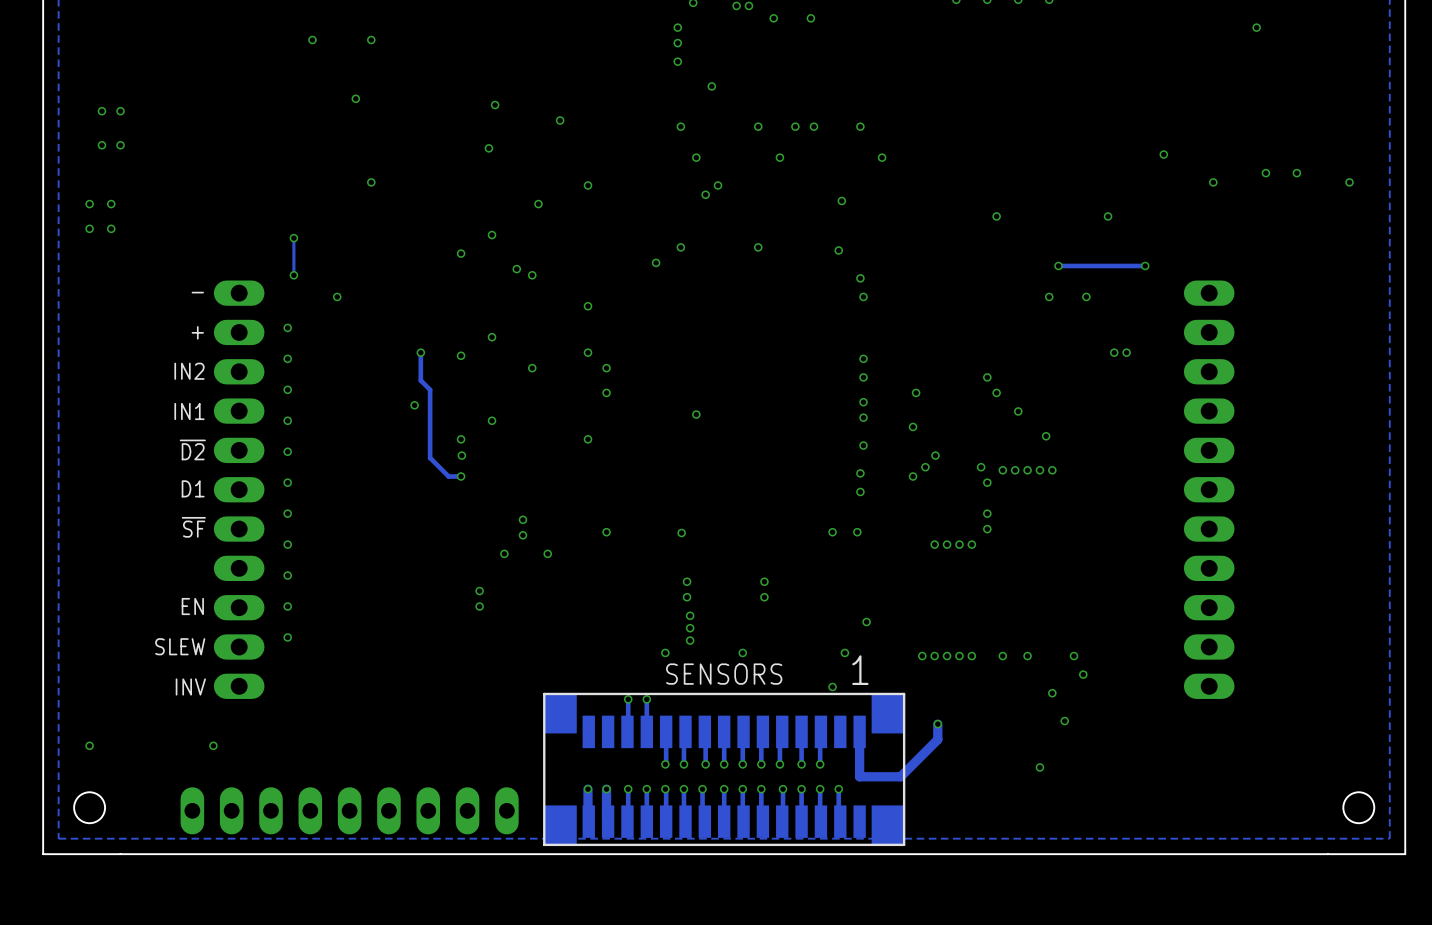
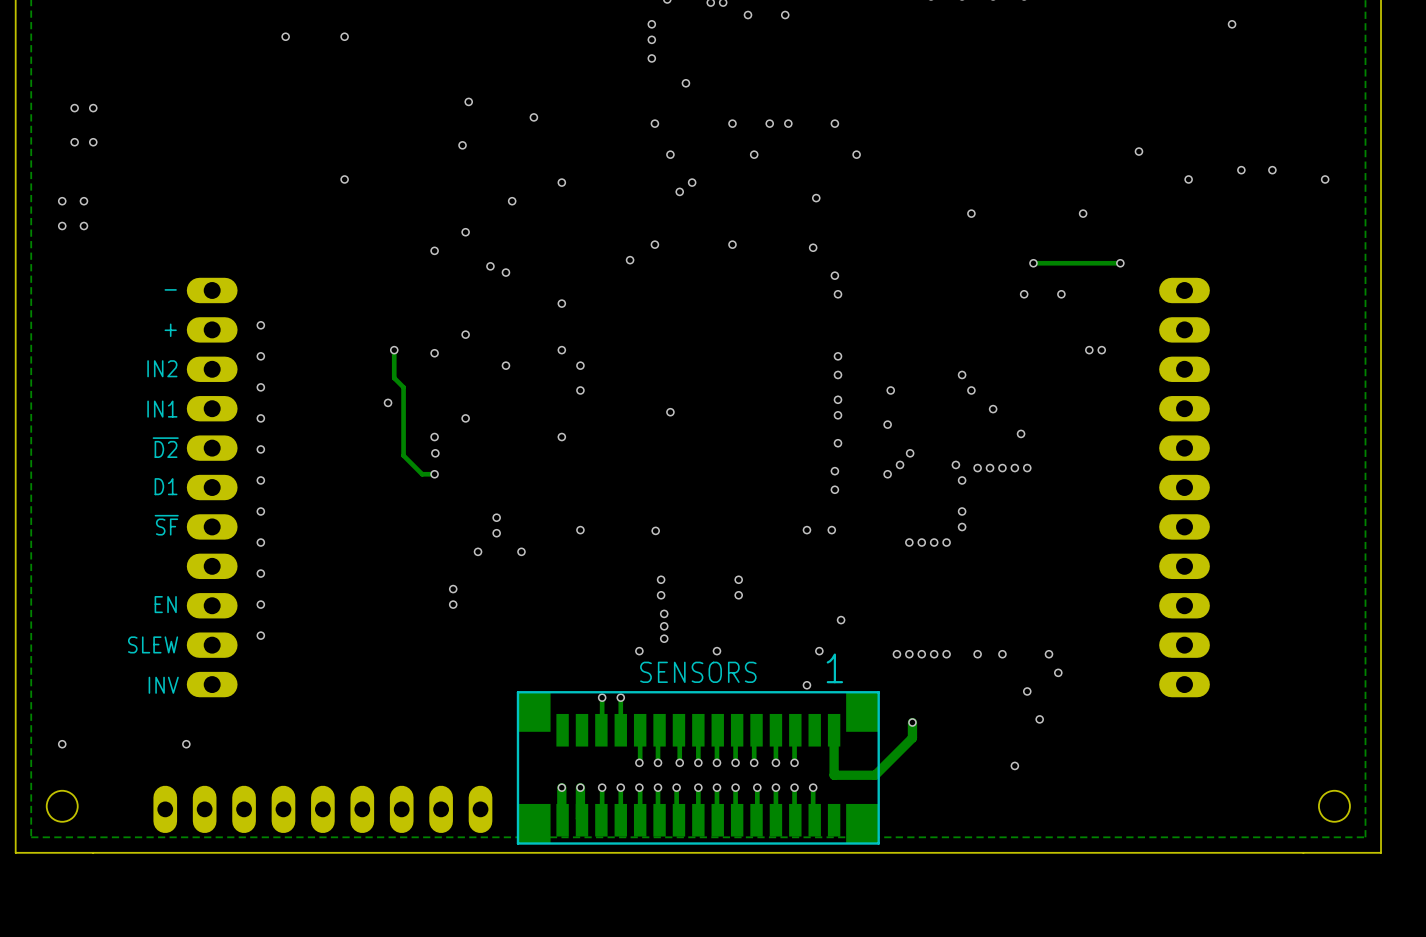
via: (355, 98) -> none
track: (293, 238) (293, 275) -> none
via: (293, 238) -> none
via: (293, 275) -> none
via: (337, 296) -> none

